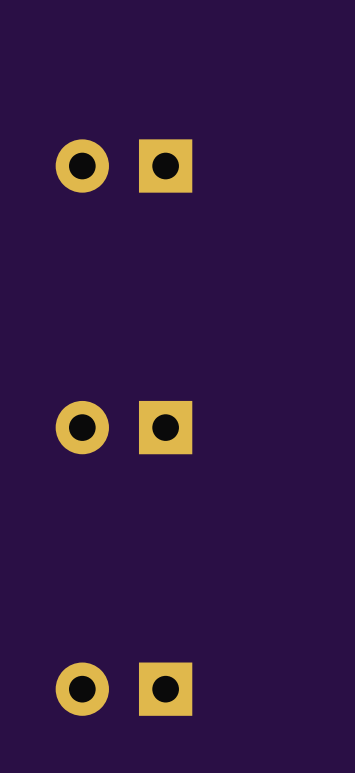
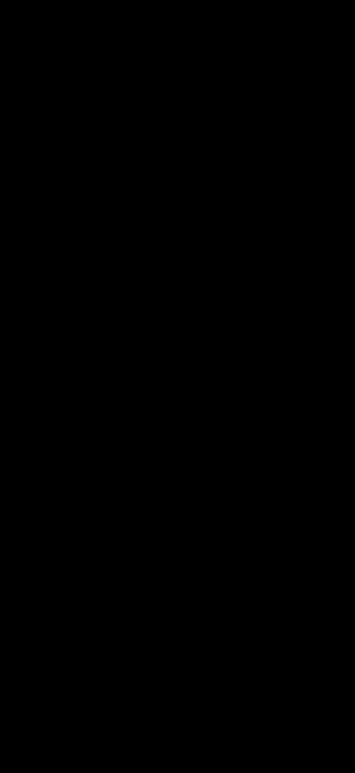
part: (123, 166) -> none
part: (123, 427) -> none
part: (123, 689) -> none

